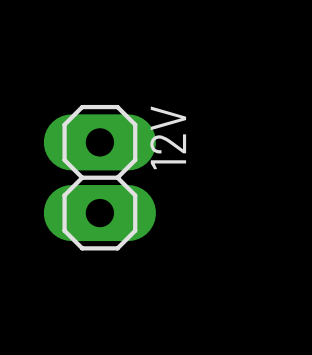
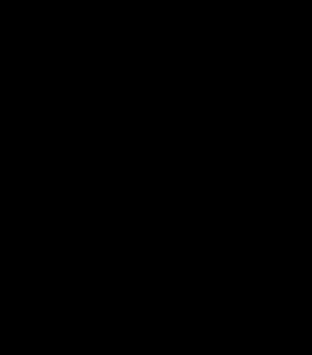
12V: (99, 177) -> none

